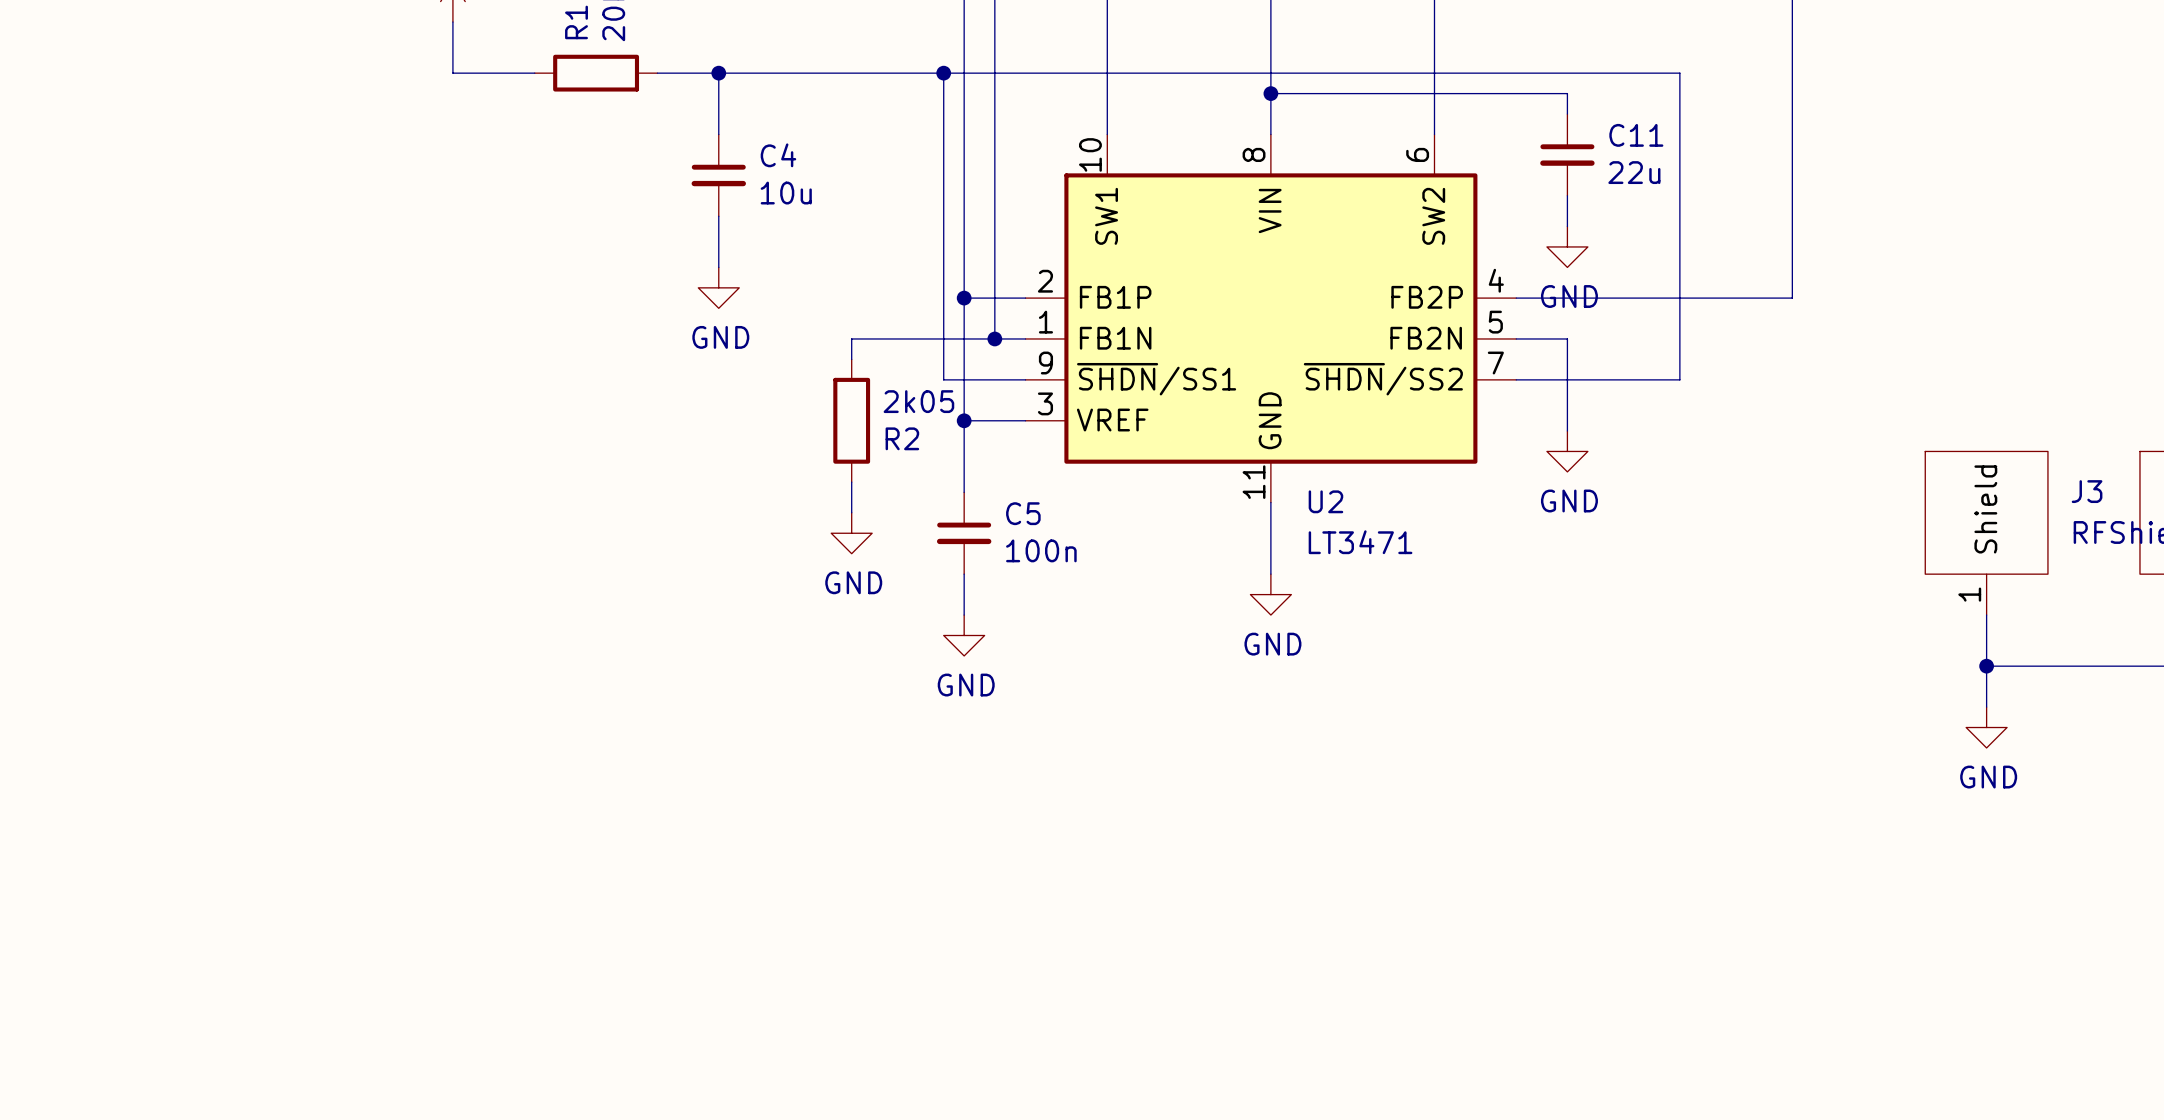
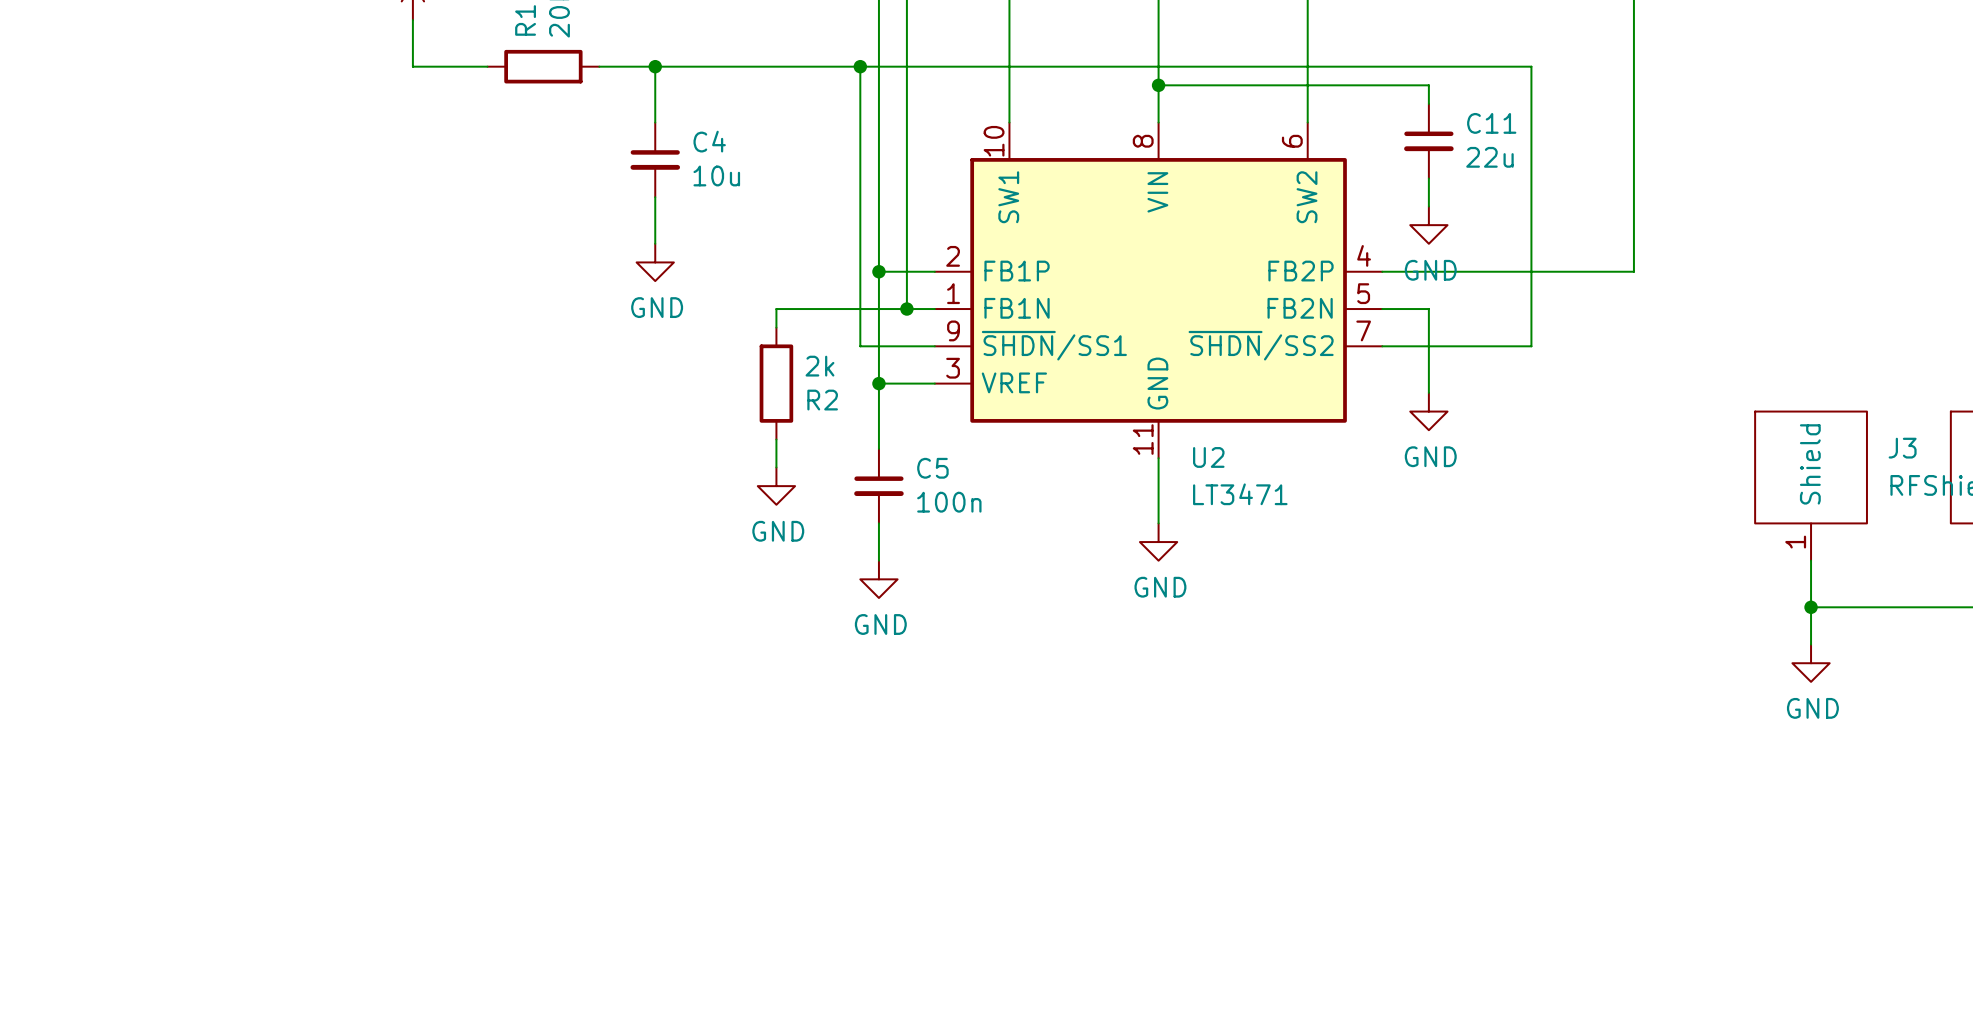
R2 value: 2k05 (918, 401) -> 2k (819, 366)

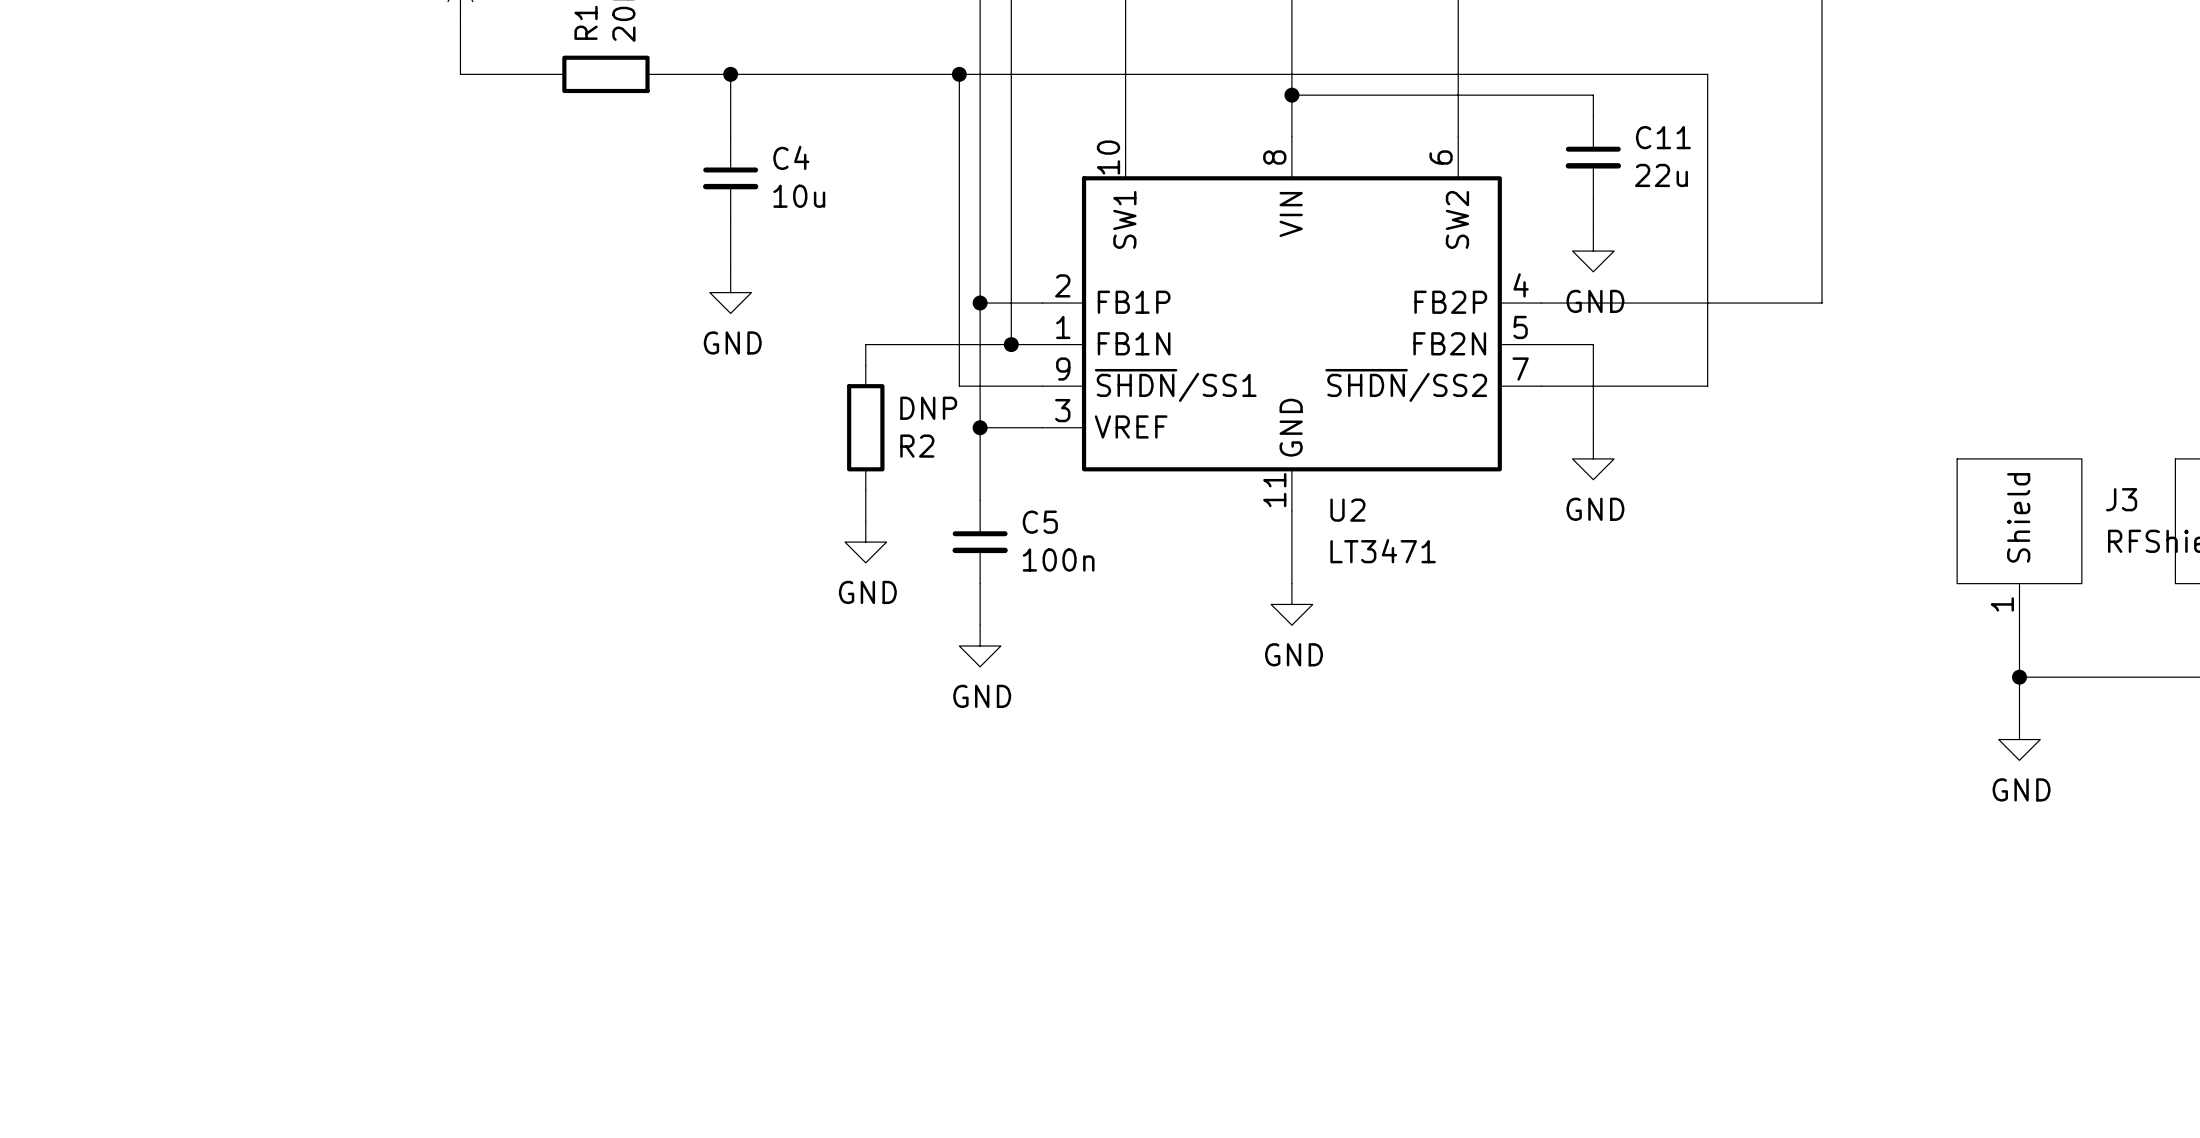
R2 value: 2k (819, 366) -> DNP (928, 408)

